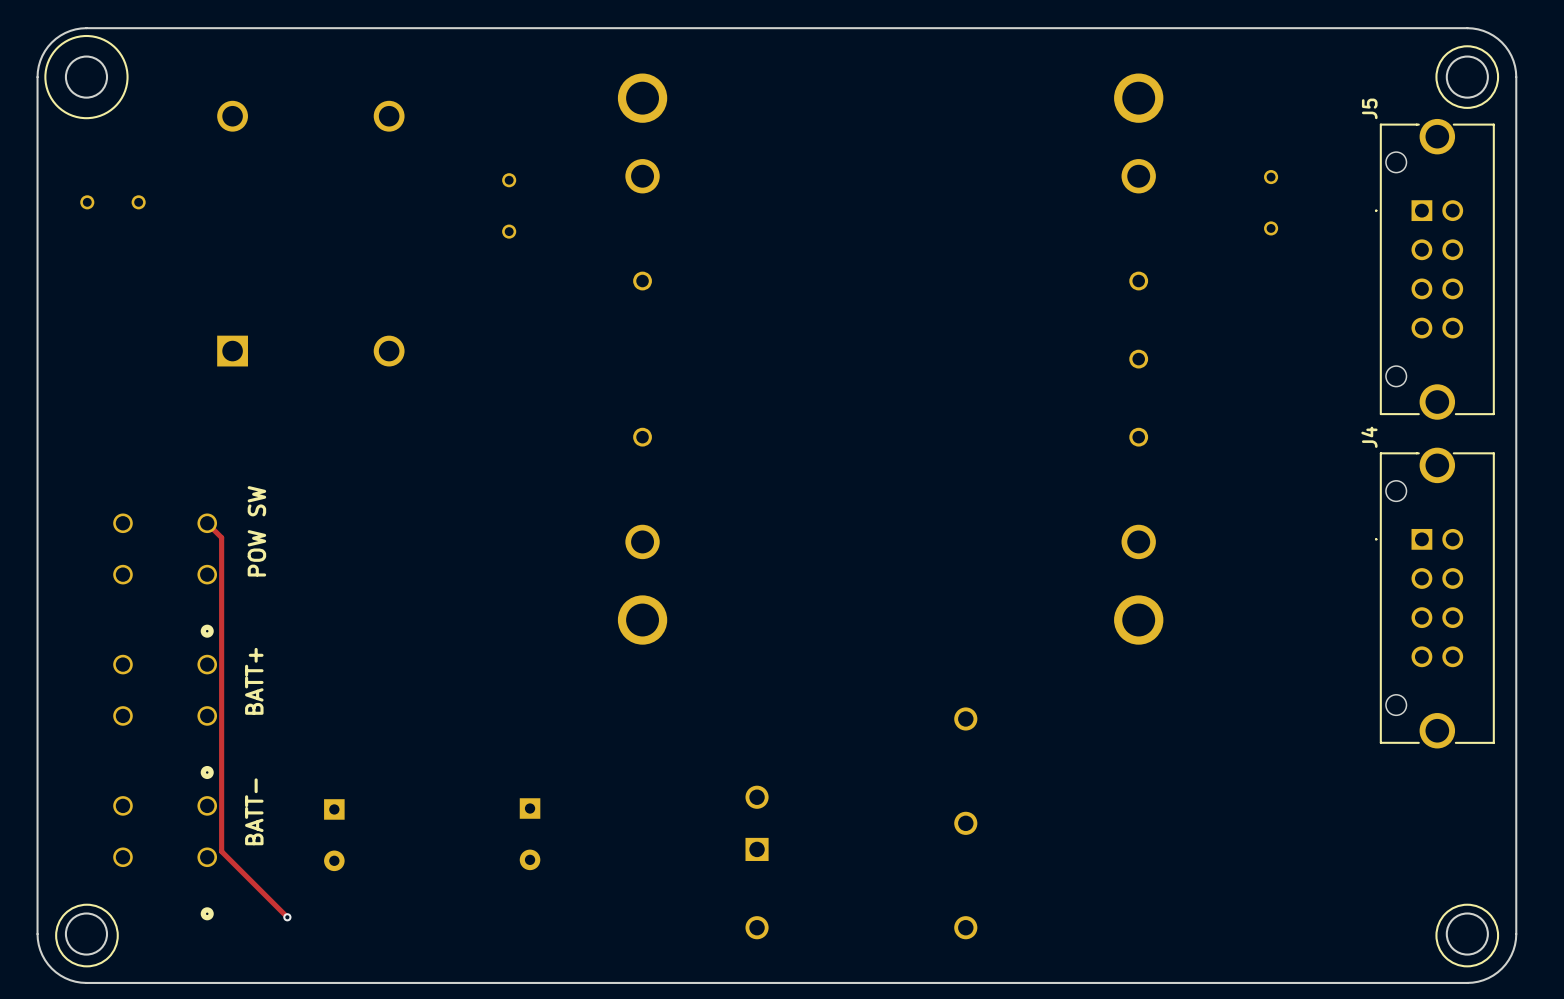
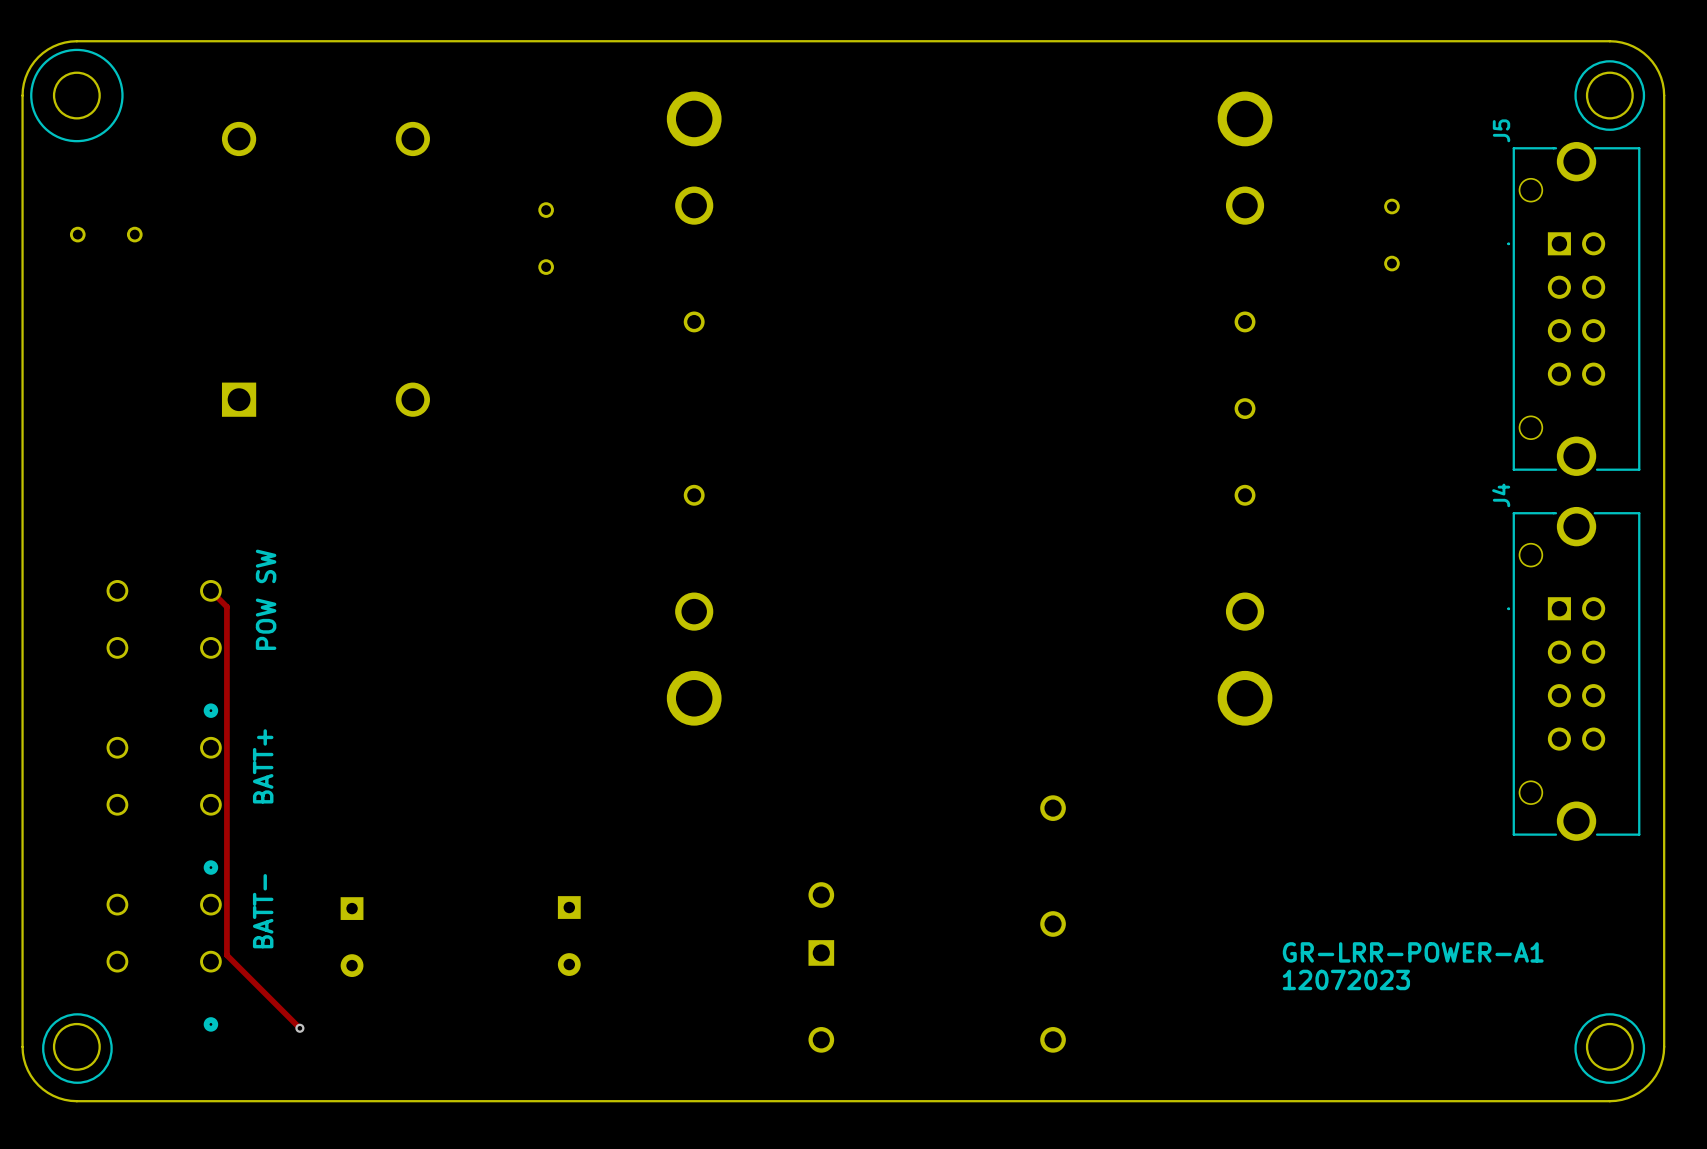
text: none -> GR-LRR-POWER-A1 (1413, 952)
text: none -> 12072023 (1346, 979)

